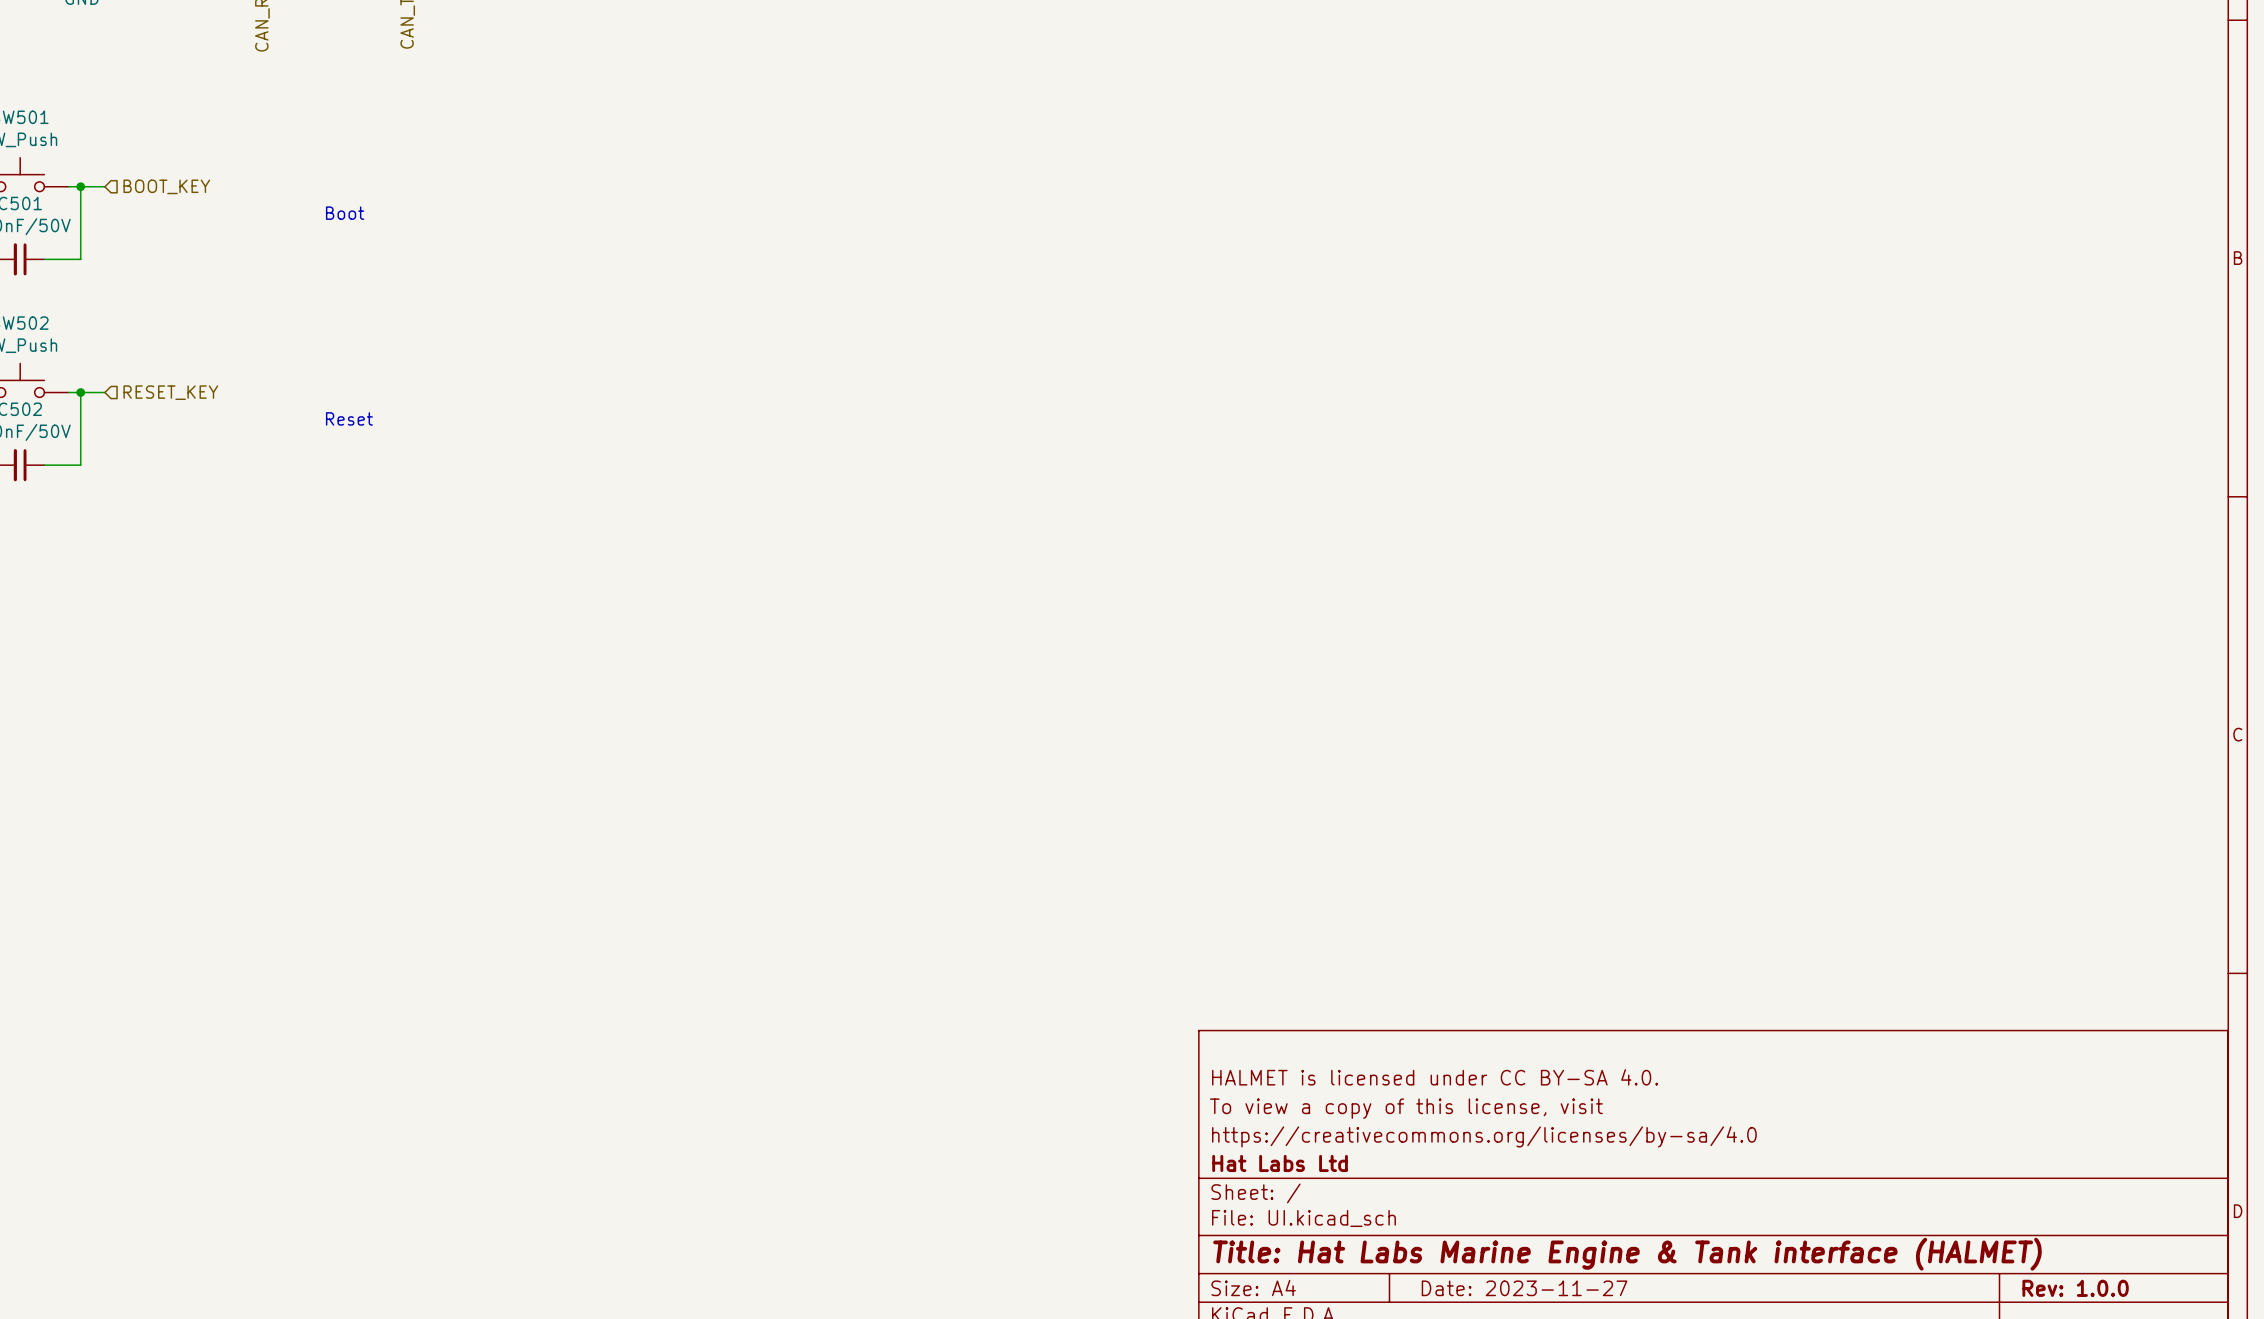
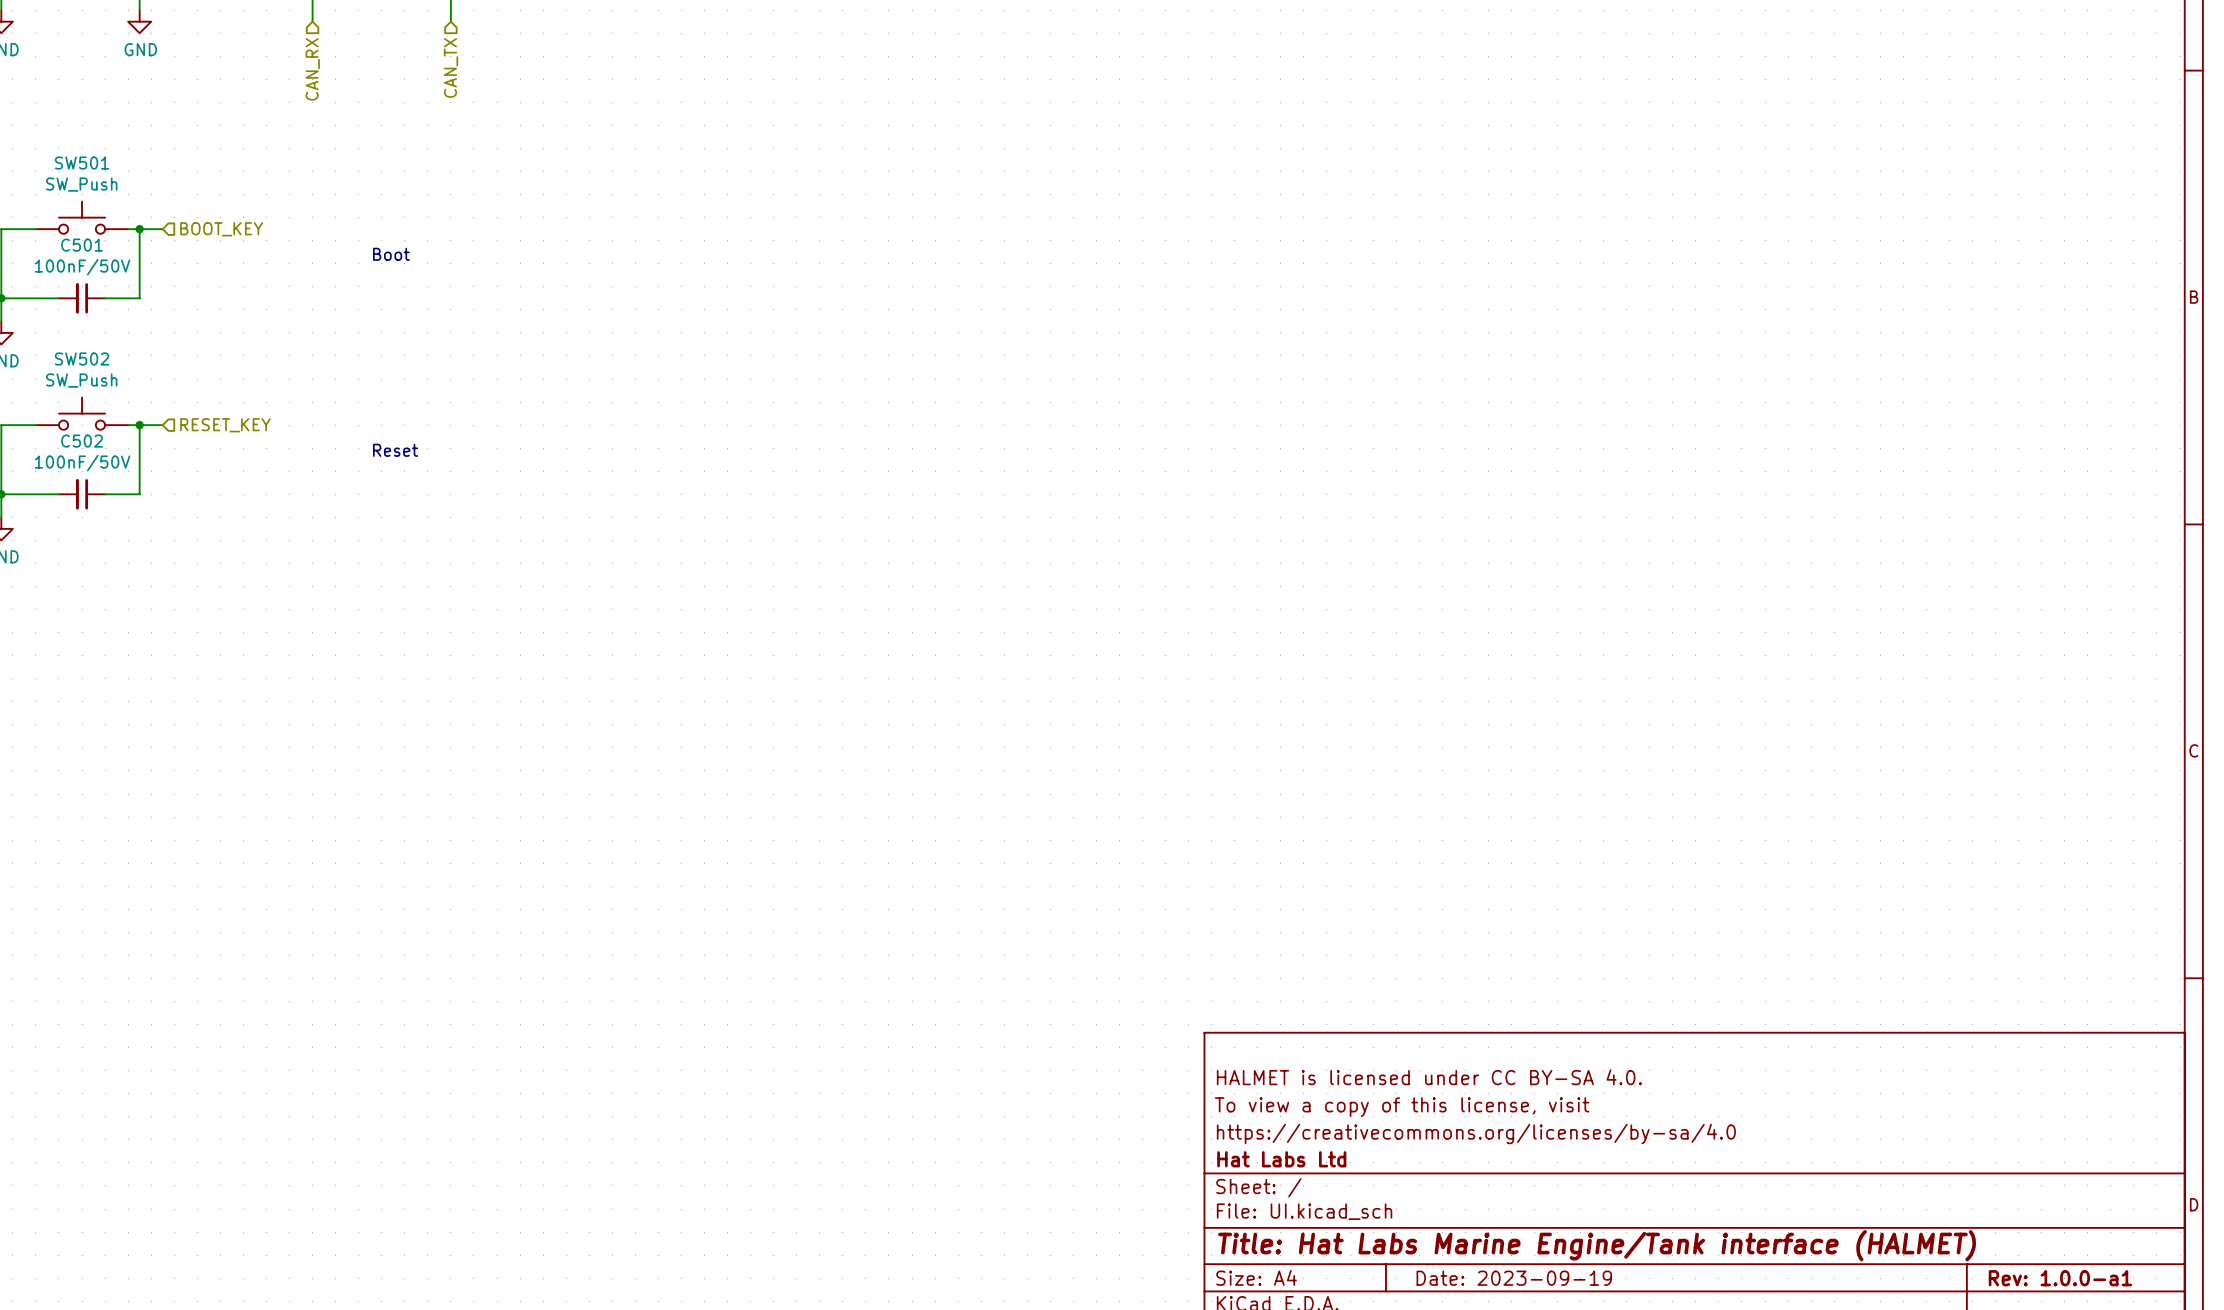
title block: Title: Hat Labs Marine Engine & Tank interface (HALMET) (1627, 1254) -> Title: Hat Labs Marine Engine/Tank interface (HALMET) (1597, 1245)
title block: Date: 2023-11-27 (1524, 1288) -> Date: 2023-09-19 (1514, 1278)
title block: Rev: 1.0.0 (2075, 1288) -> Rev: 1.0.0-a1 (2060, 1278)

